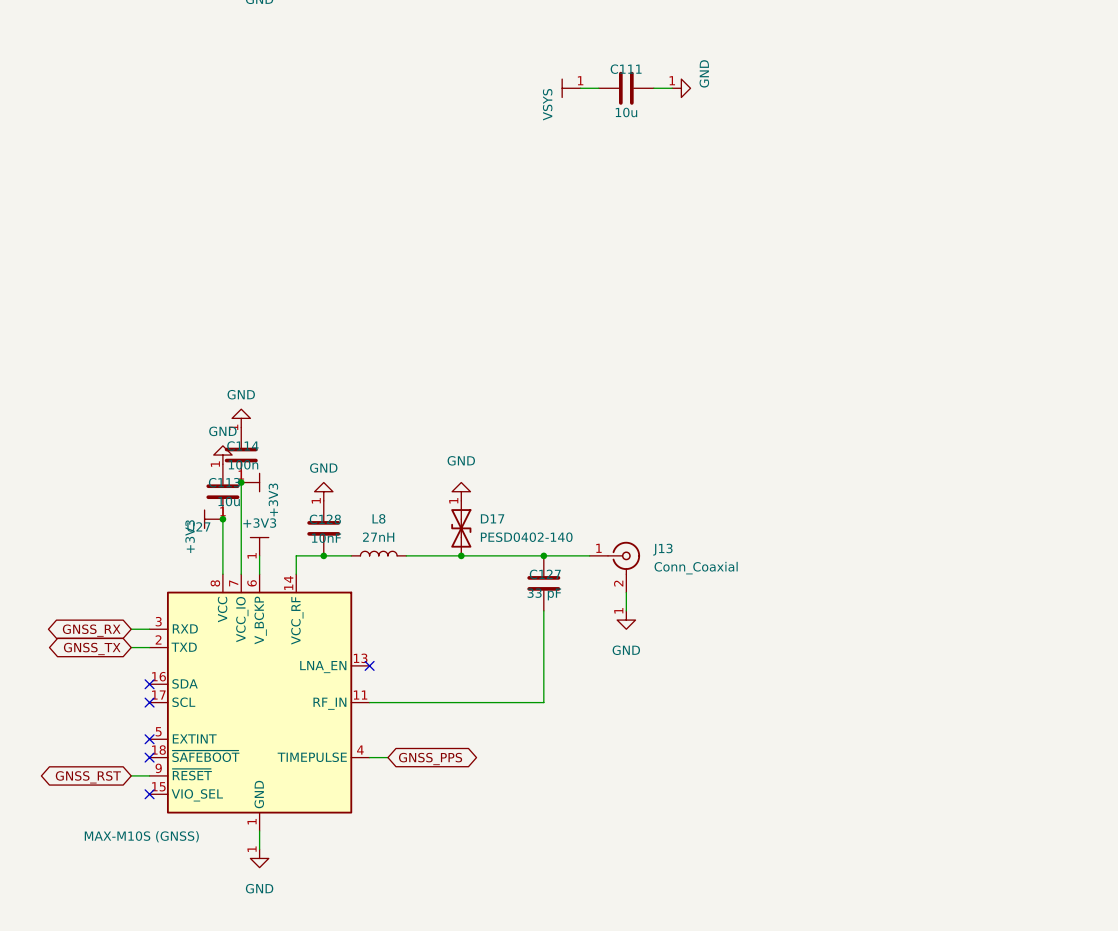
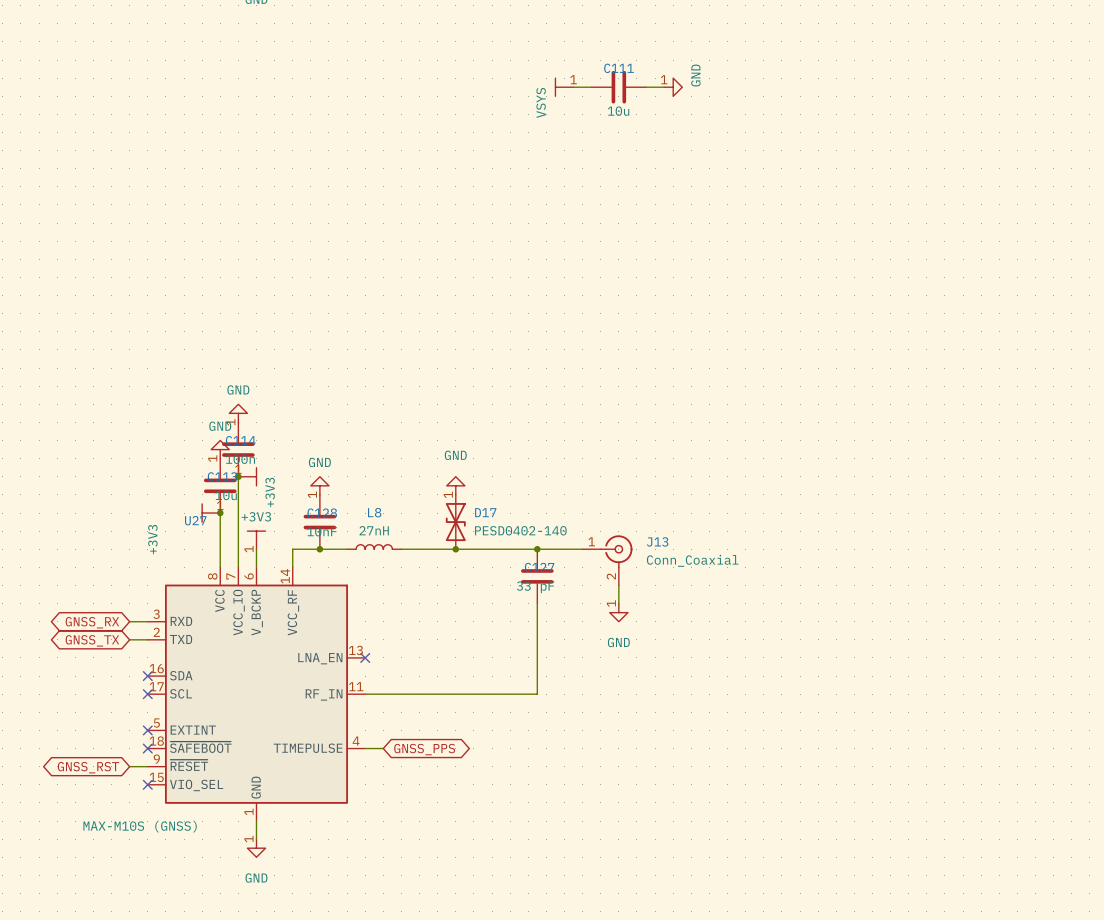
power symbol text position: +3V3 (190, 536) -> +3V3 (152, 539)

